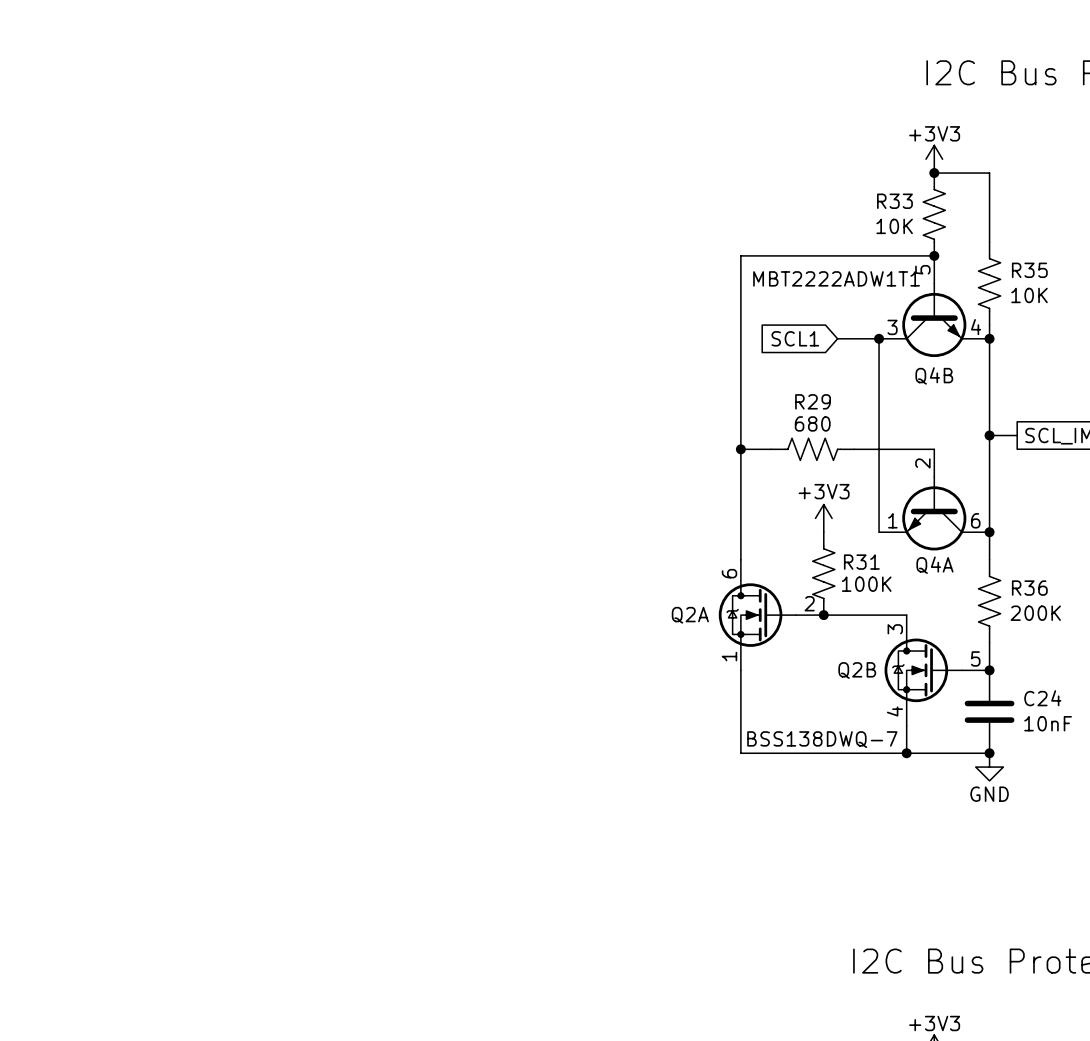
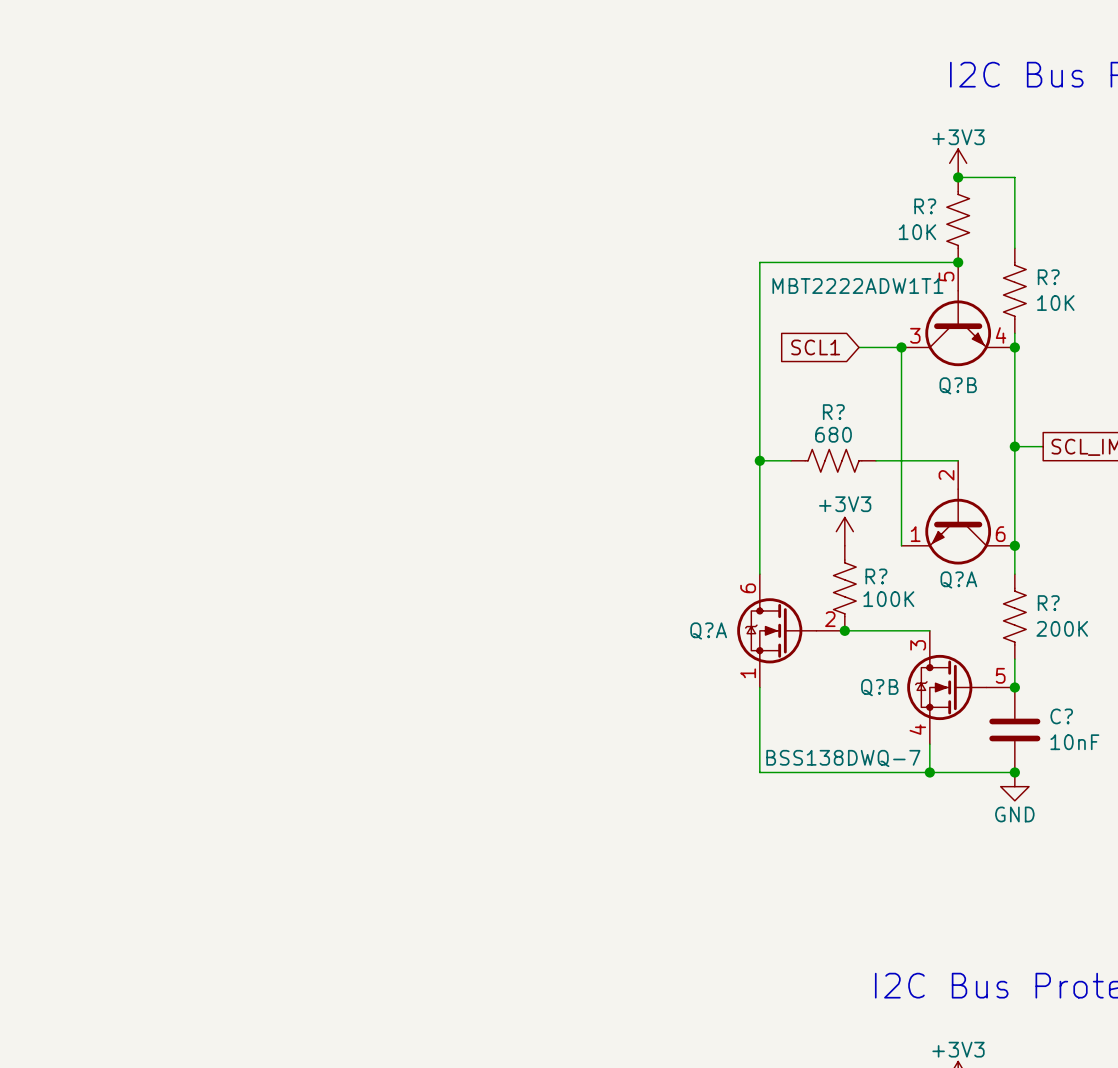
R33 name: R33 (894, 201) -> R? (925, 206)
R35 name: R35 (1029, 270) -> R? (1048, 277)
Q4B name: Q4B (934, 375) -> Q?B (958, 385)
R29 name: R29 (813, 401) -> R? (833, 412)
R31 name: R31 (861, 562) -> R? (876, 576)
Q4A name: Q4A (934, 565) -> Q?A (958, 579)
R36 name: R36 (1029, 588) -> R? (1048, 603)
Q2A name: Q2A (690, 615) -> Q?A (708, 630)
Q2B name: Q2B (857, 670) -> Q?B (879, 687)
C24 name: C24 (1042, 698) -> C? (1061, 716)

